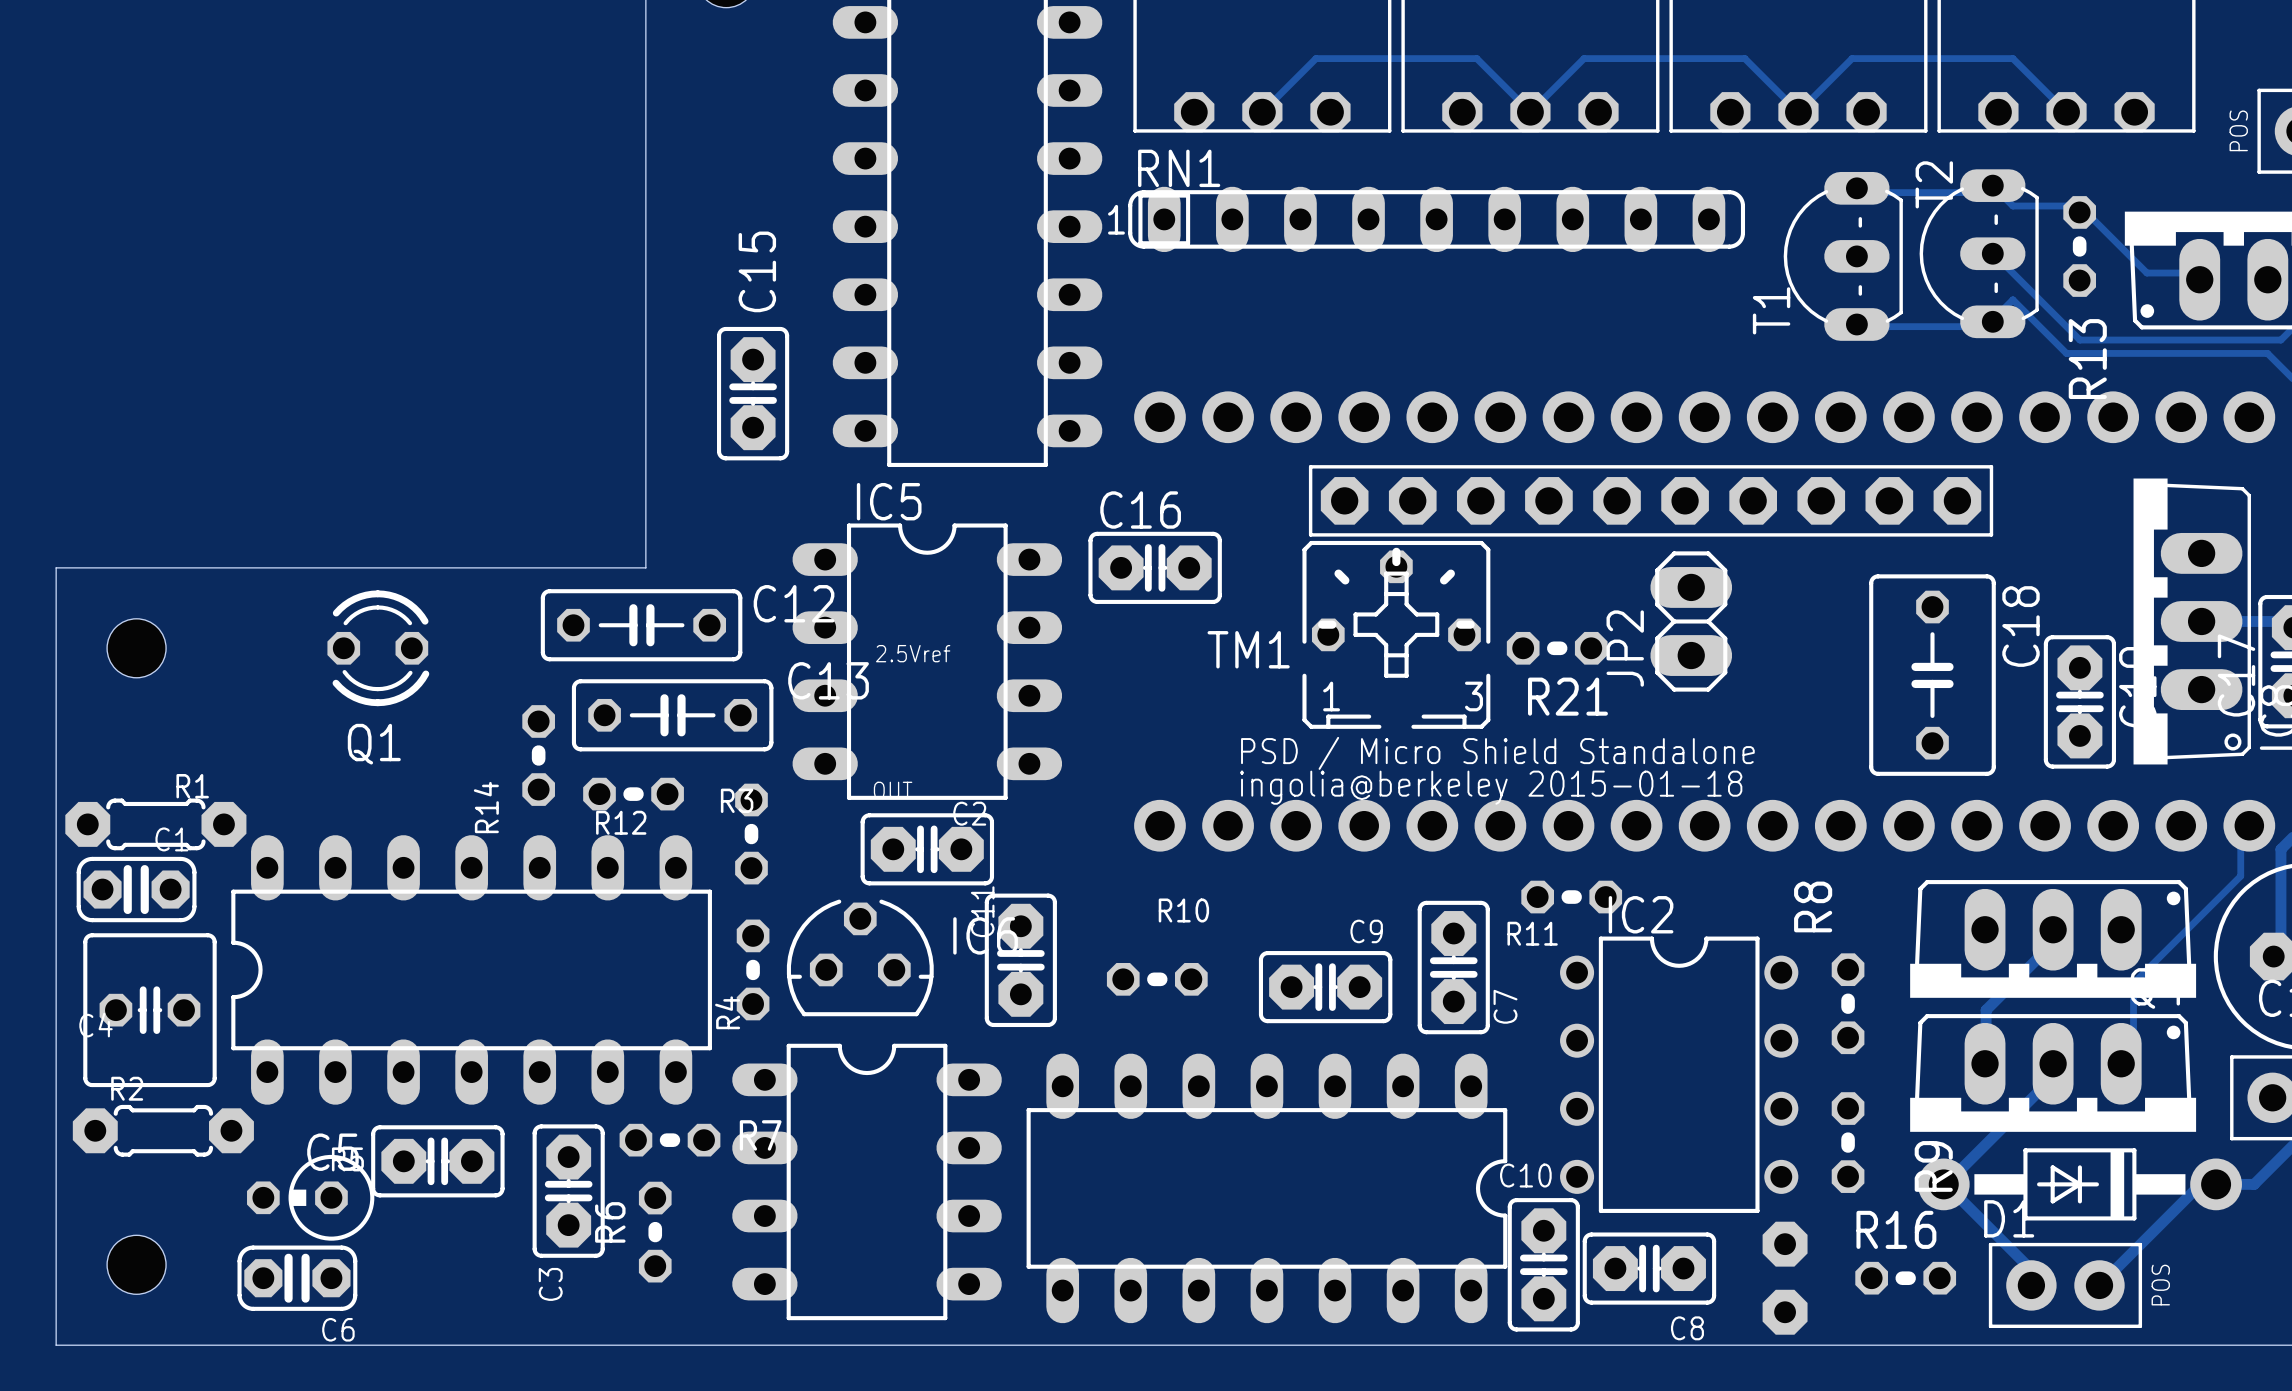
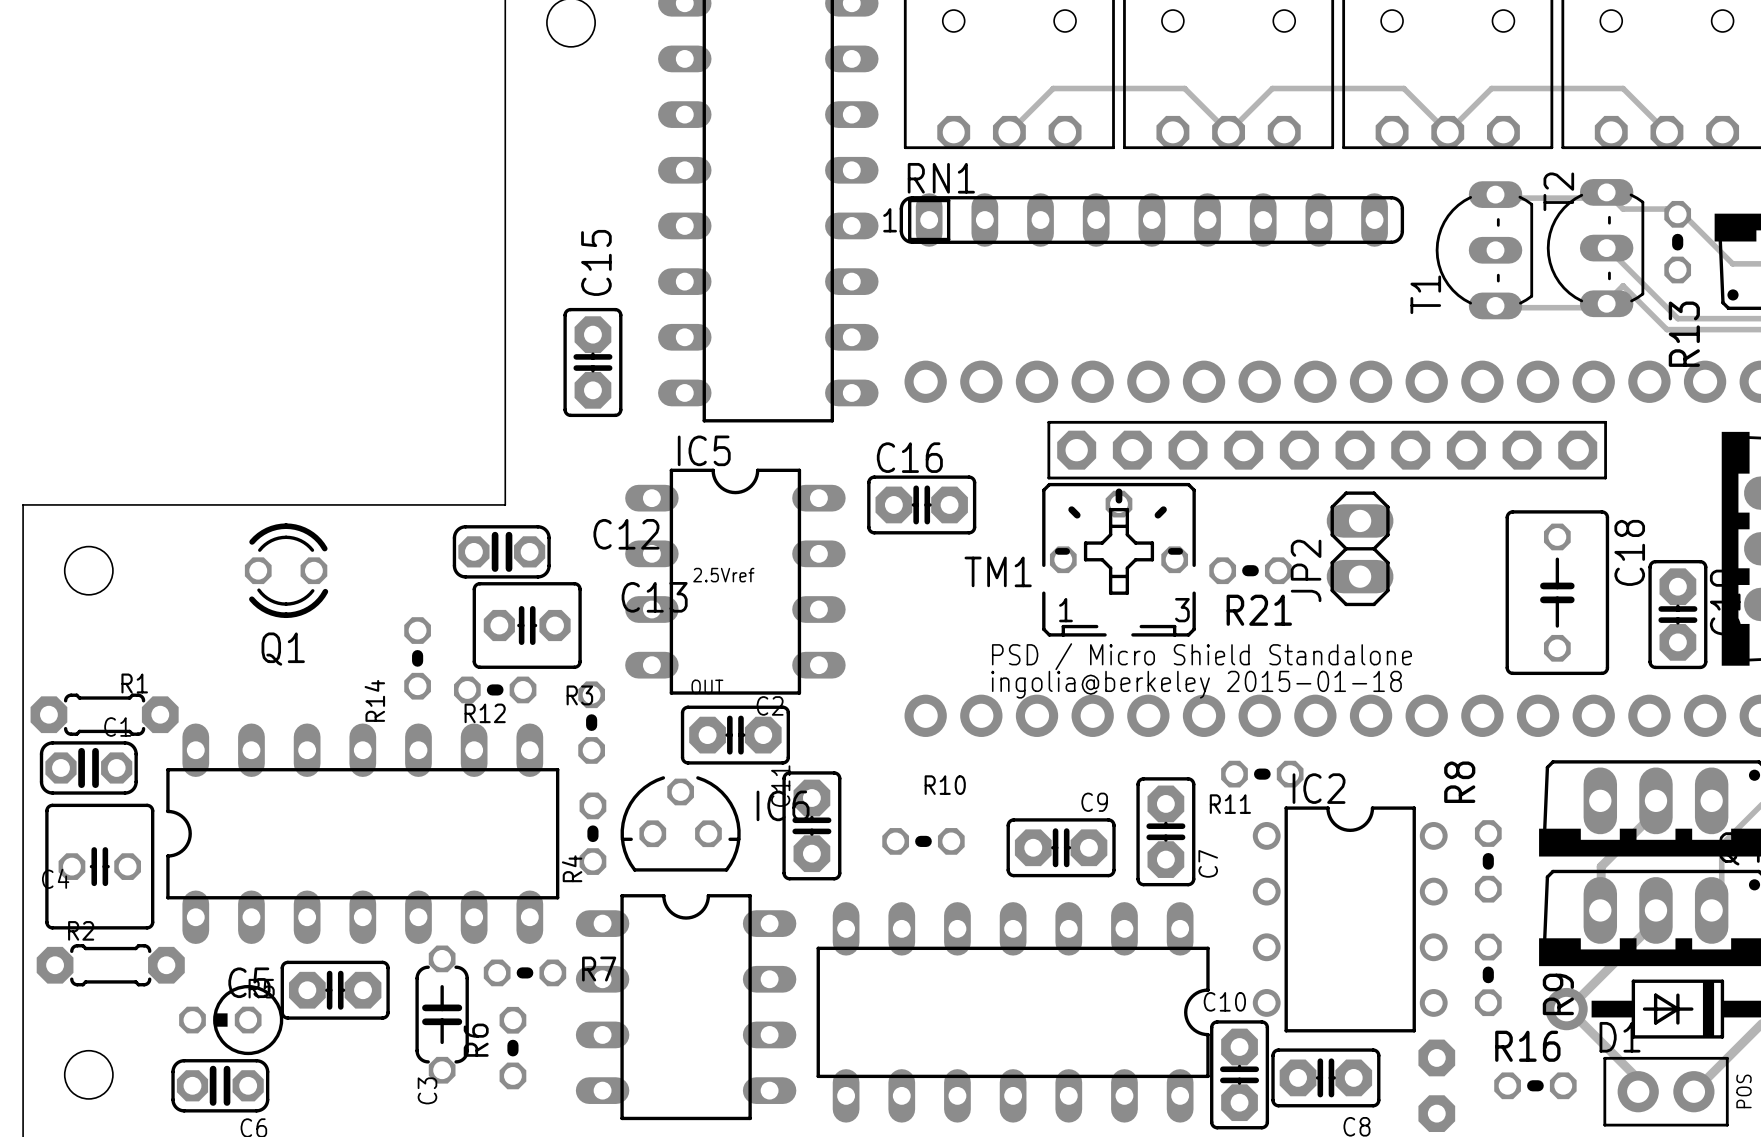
C12 footprint: [540, 589, 743, 662] -> [452, 525, 551, 579]
C13 footprint: [571, 679, 774, 752] -> [472, 582, 582, 669]
C3 footprint: [532, 1124, 605, 1258] -> [415, 945, 469, 1084]

